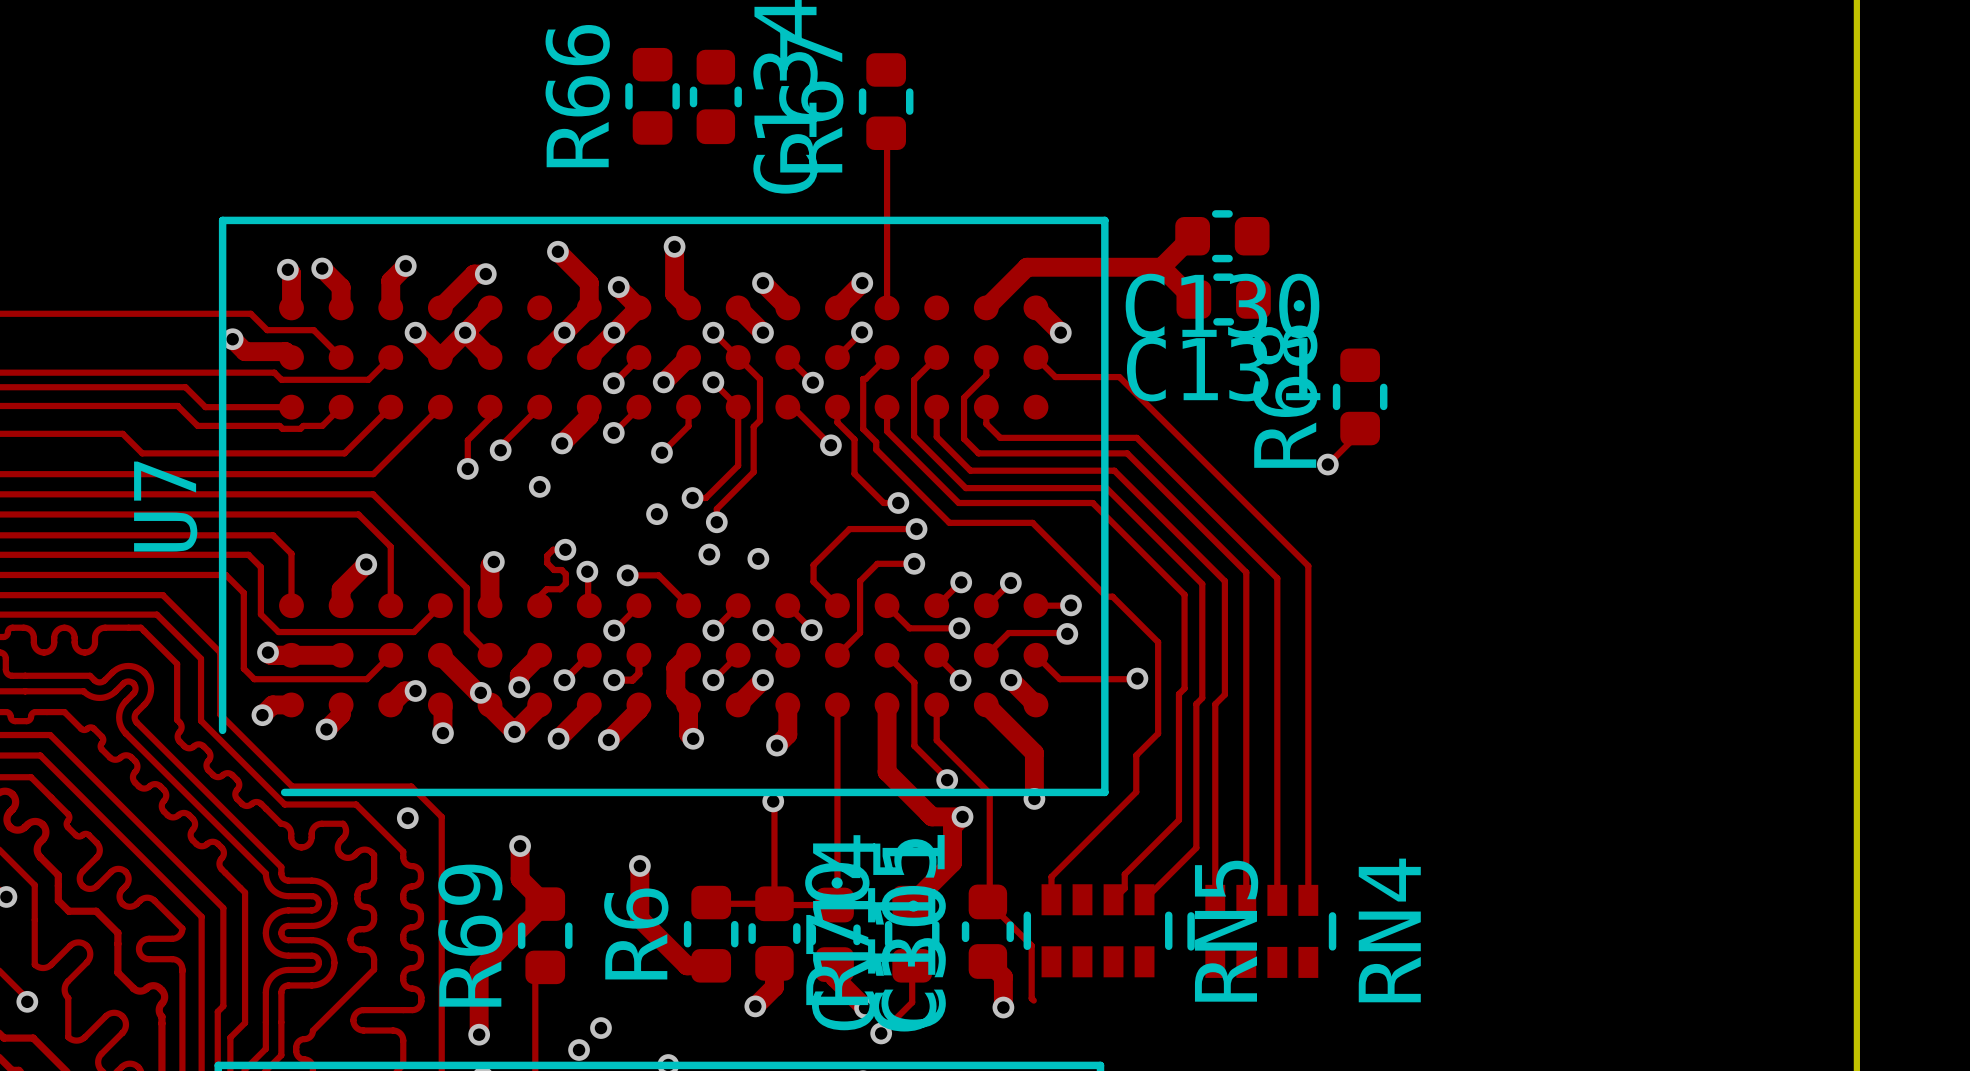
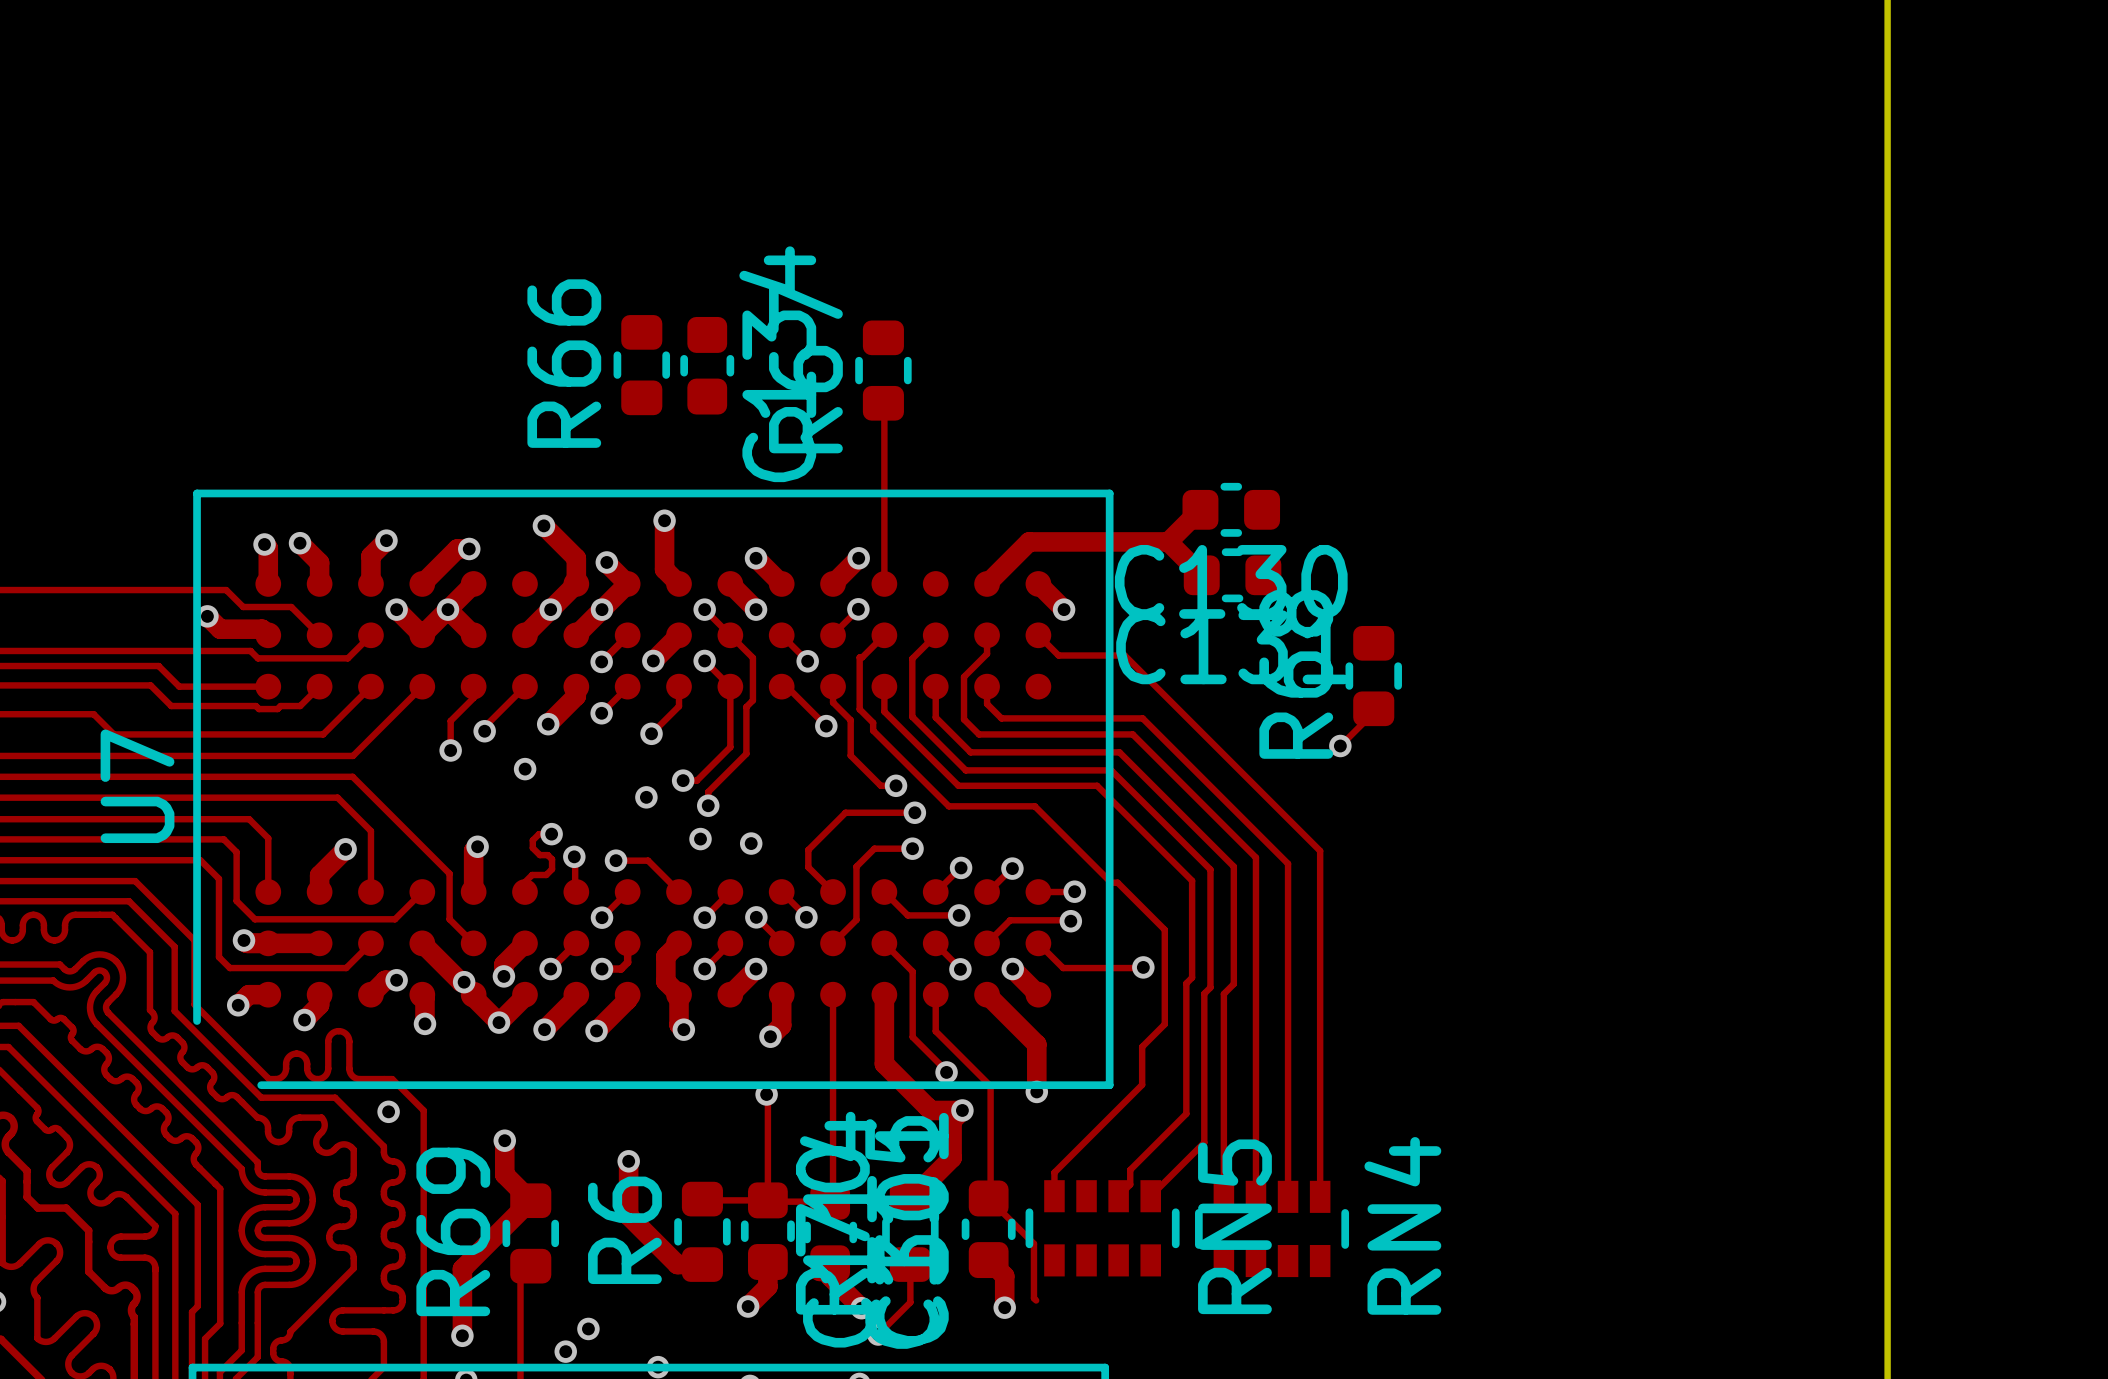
track: (298, 786) (380, 786) -> (275, 1079) (284, 1074) (288, 1057) (296, 1053) (305, 1058) (307, 1072) (311, 1076) (317, 1079) (324, 1076) (328, 1069) (328, 1038) (333, 1032) (338, 1031) (344, 1032) (348, 1037) (349, 1070) (353, 1076) (359, 1079)

